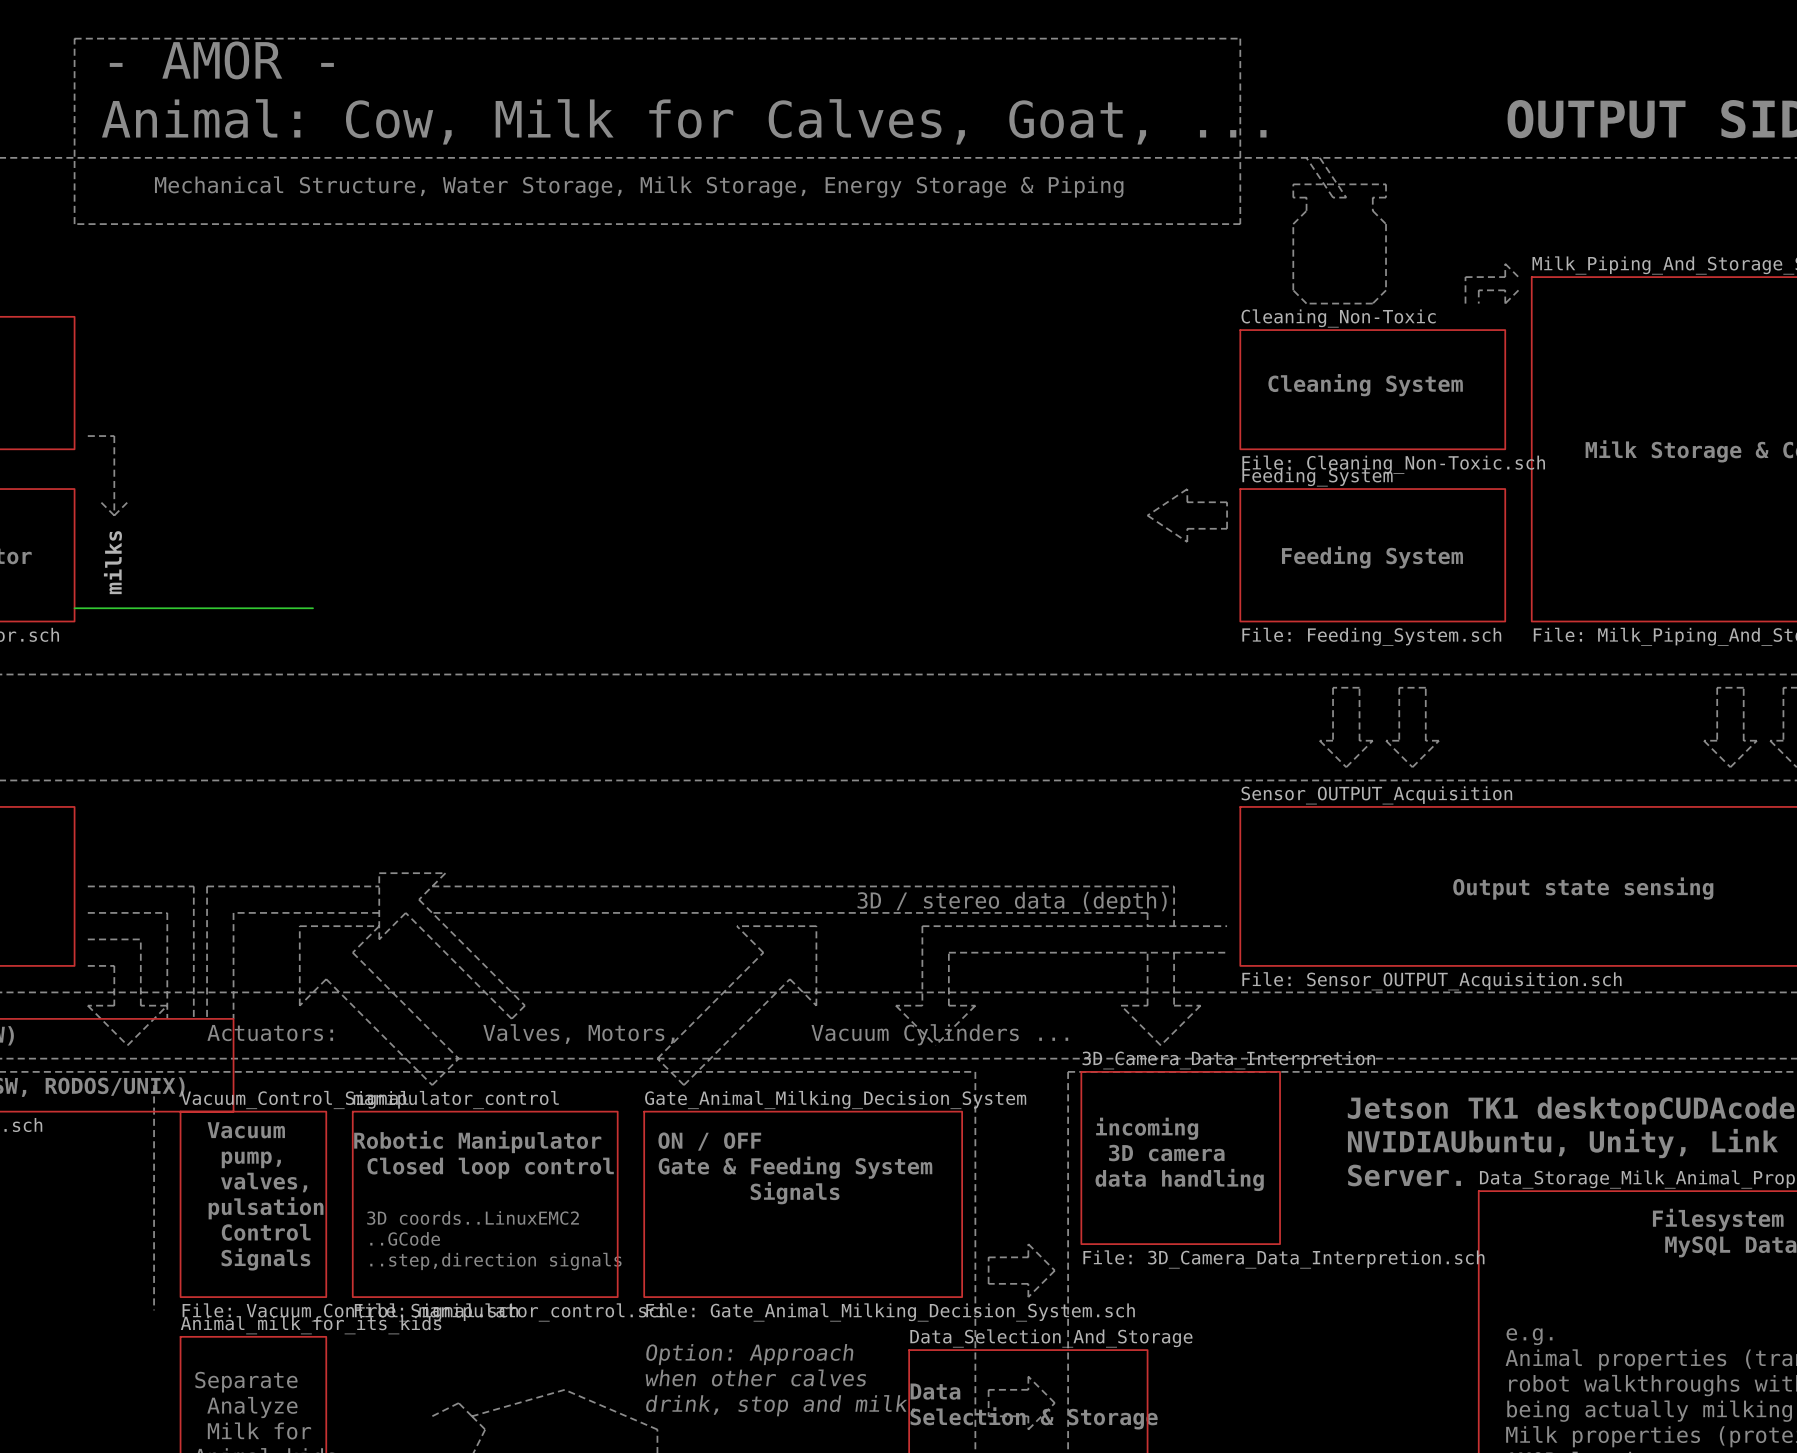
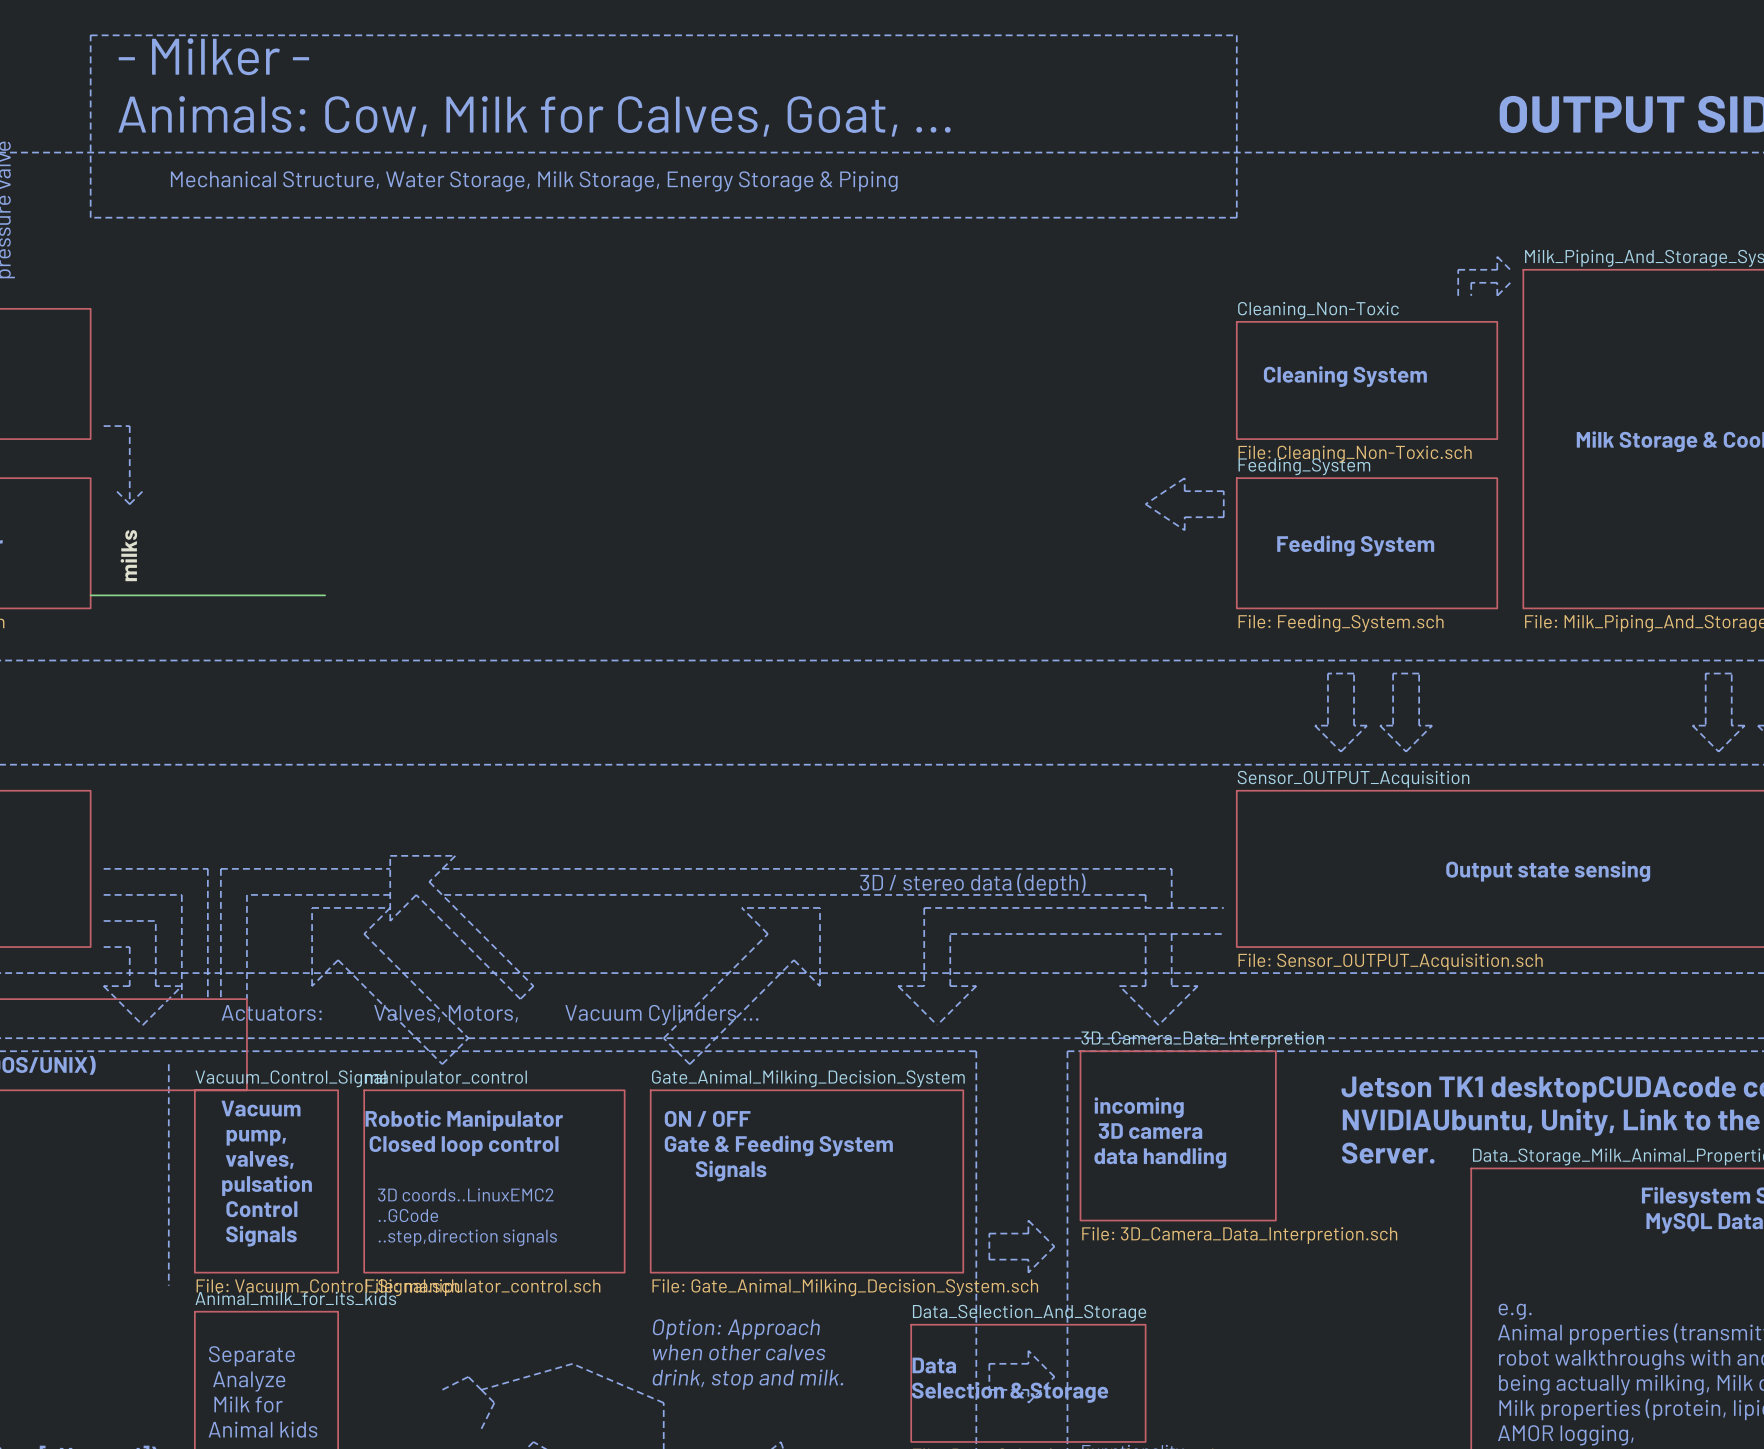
text: - AMOR - (221, 60) -> - Milker - (213, 56)
text: Animal: Cow, Milk for Calves, Goat, ... (684, 121) -> Animals: Cow, Milk for Calves, Goat, ... (534, 116)
line: (1306, 157) (1333, 197) (1346, 197) (1319, 157) -> none
line: (1293, 184) (1293, 197) (1306, 197) (1306, 210) (1293, 224) (1293, 290) (1306, 303) (1372, 303) (1386, 290) (1386, 224) (1372, 210) (1372, 197) (1386, 197) (1386, 184) (1293, 184) -> none

